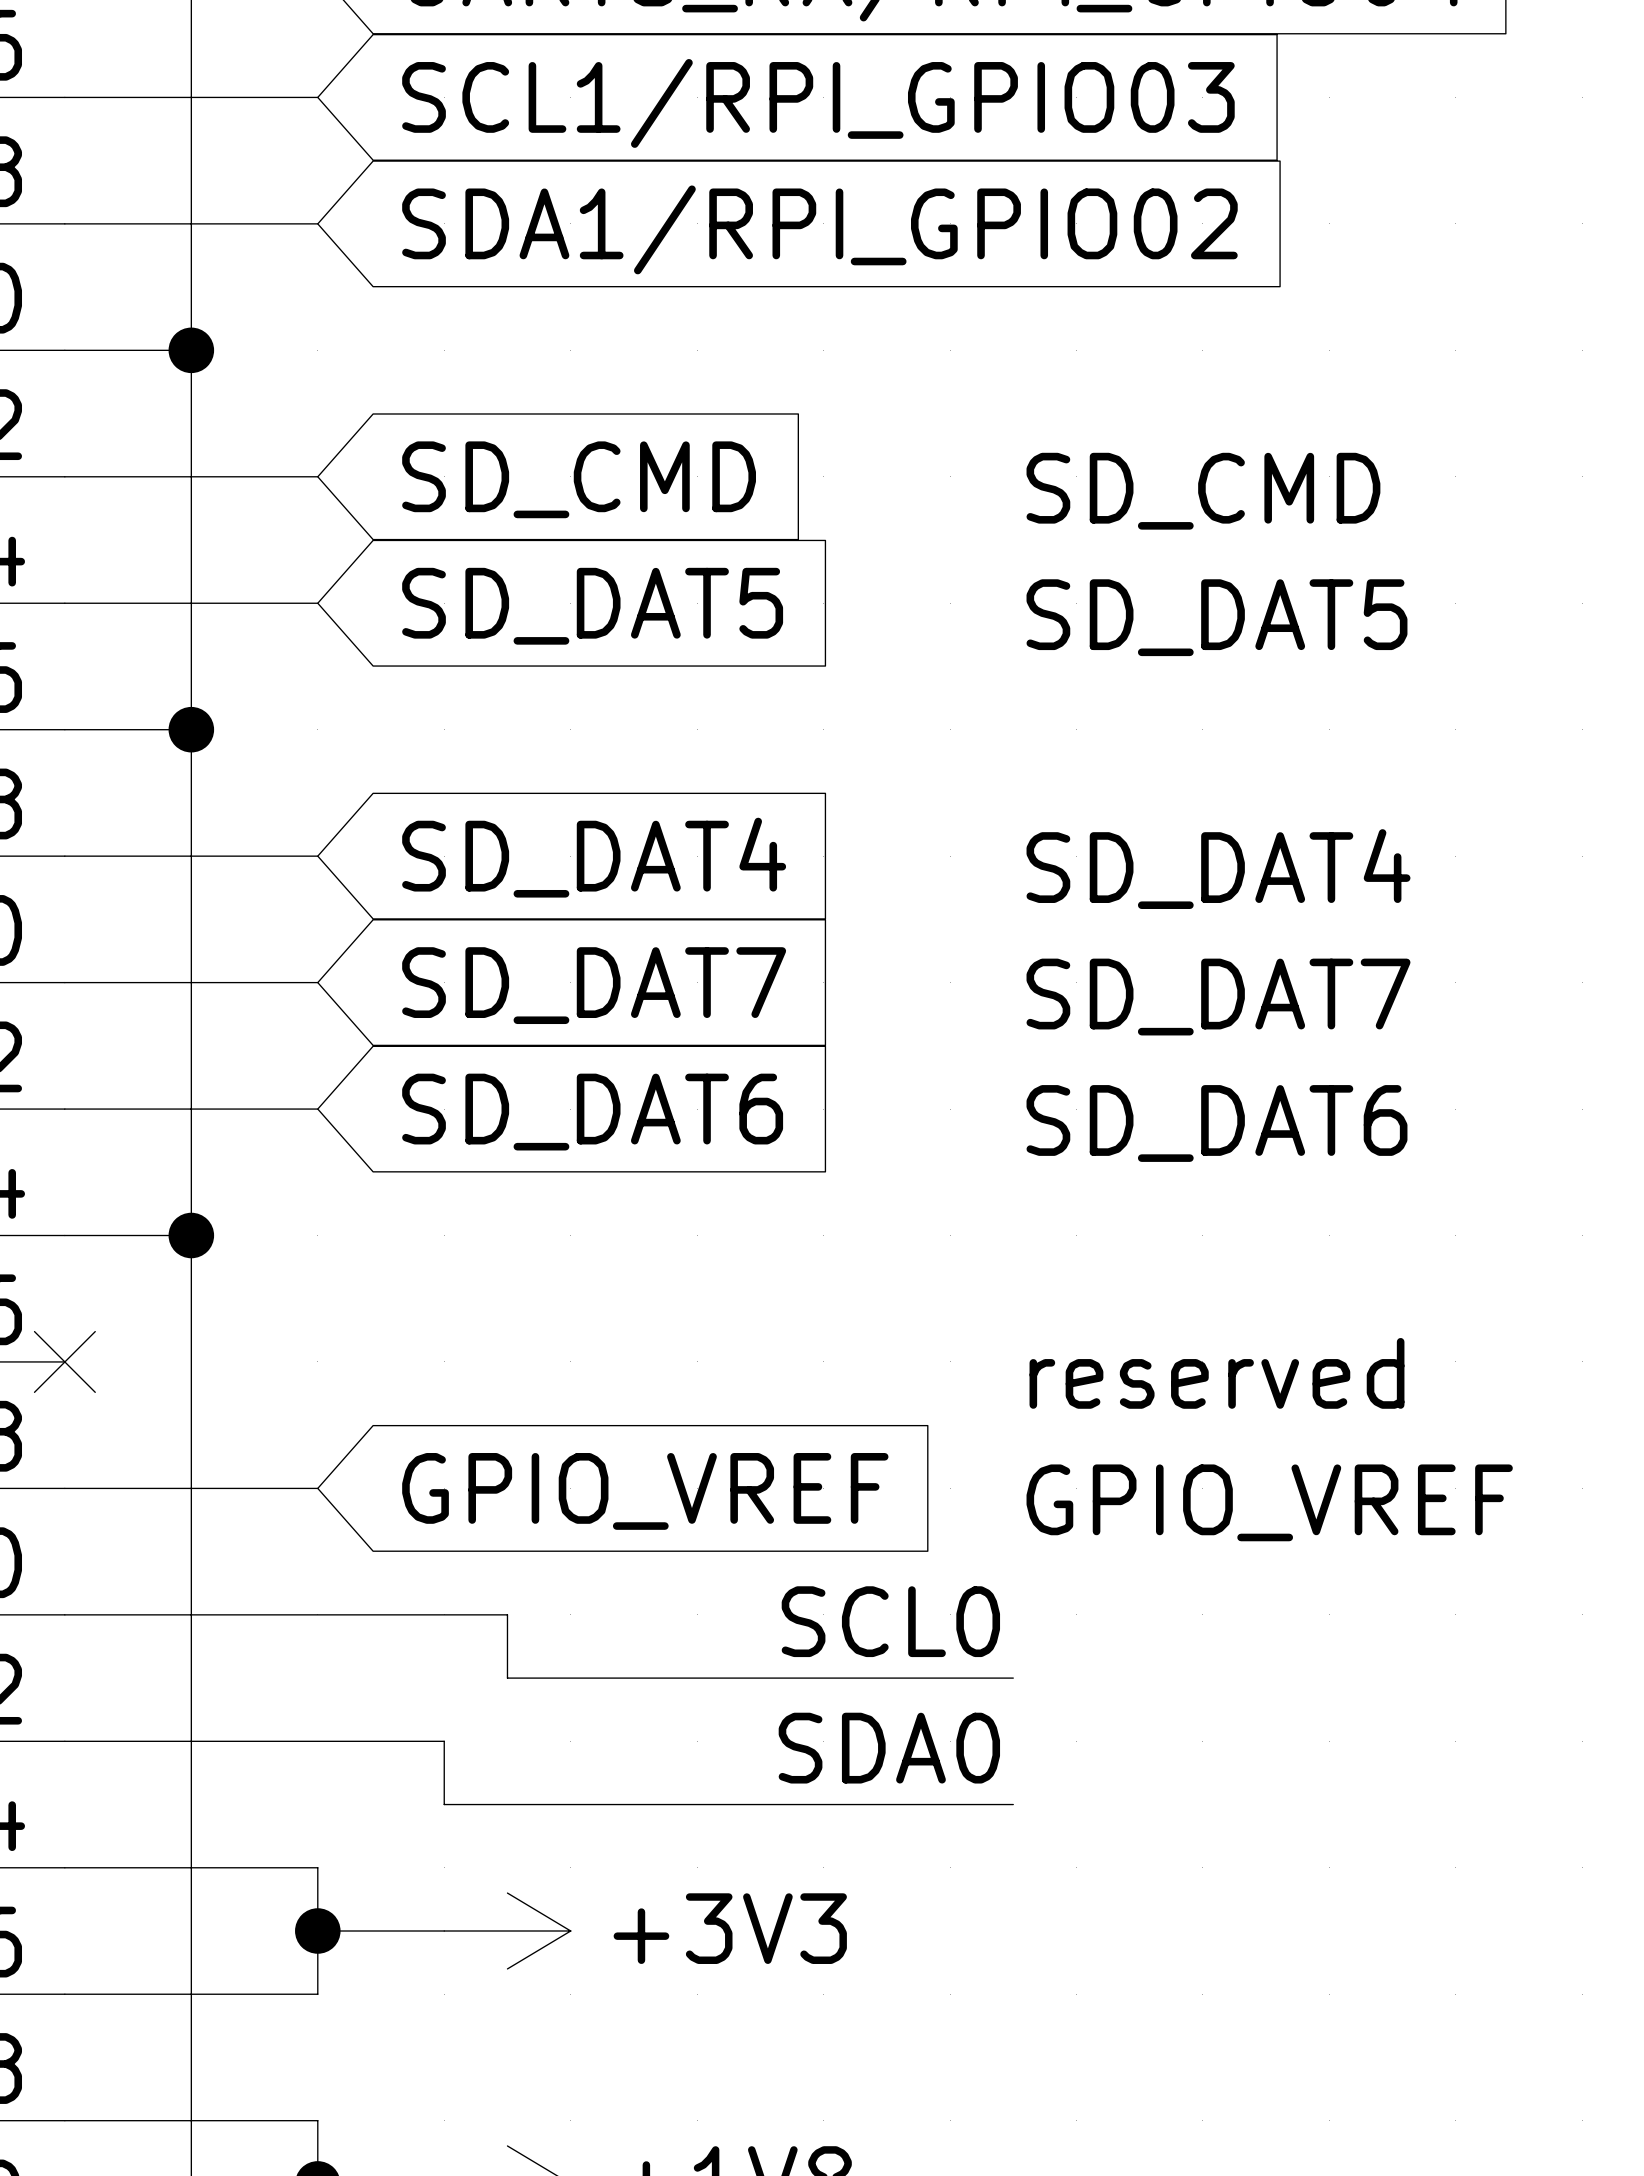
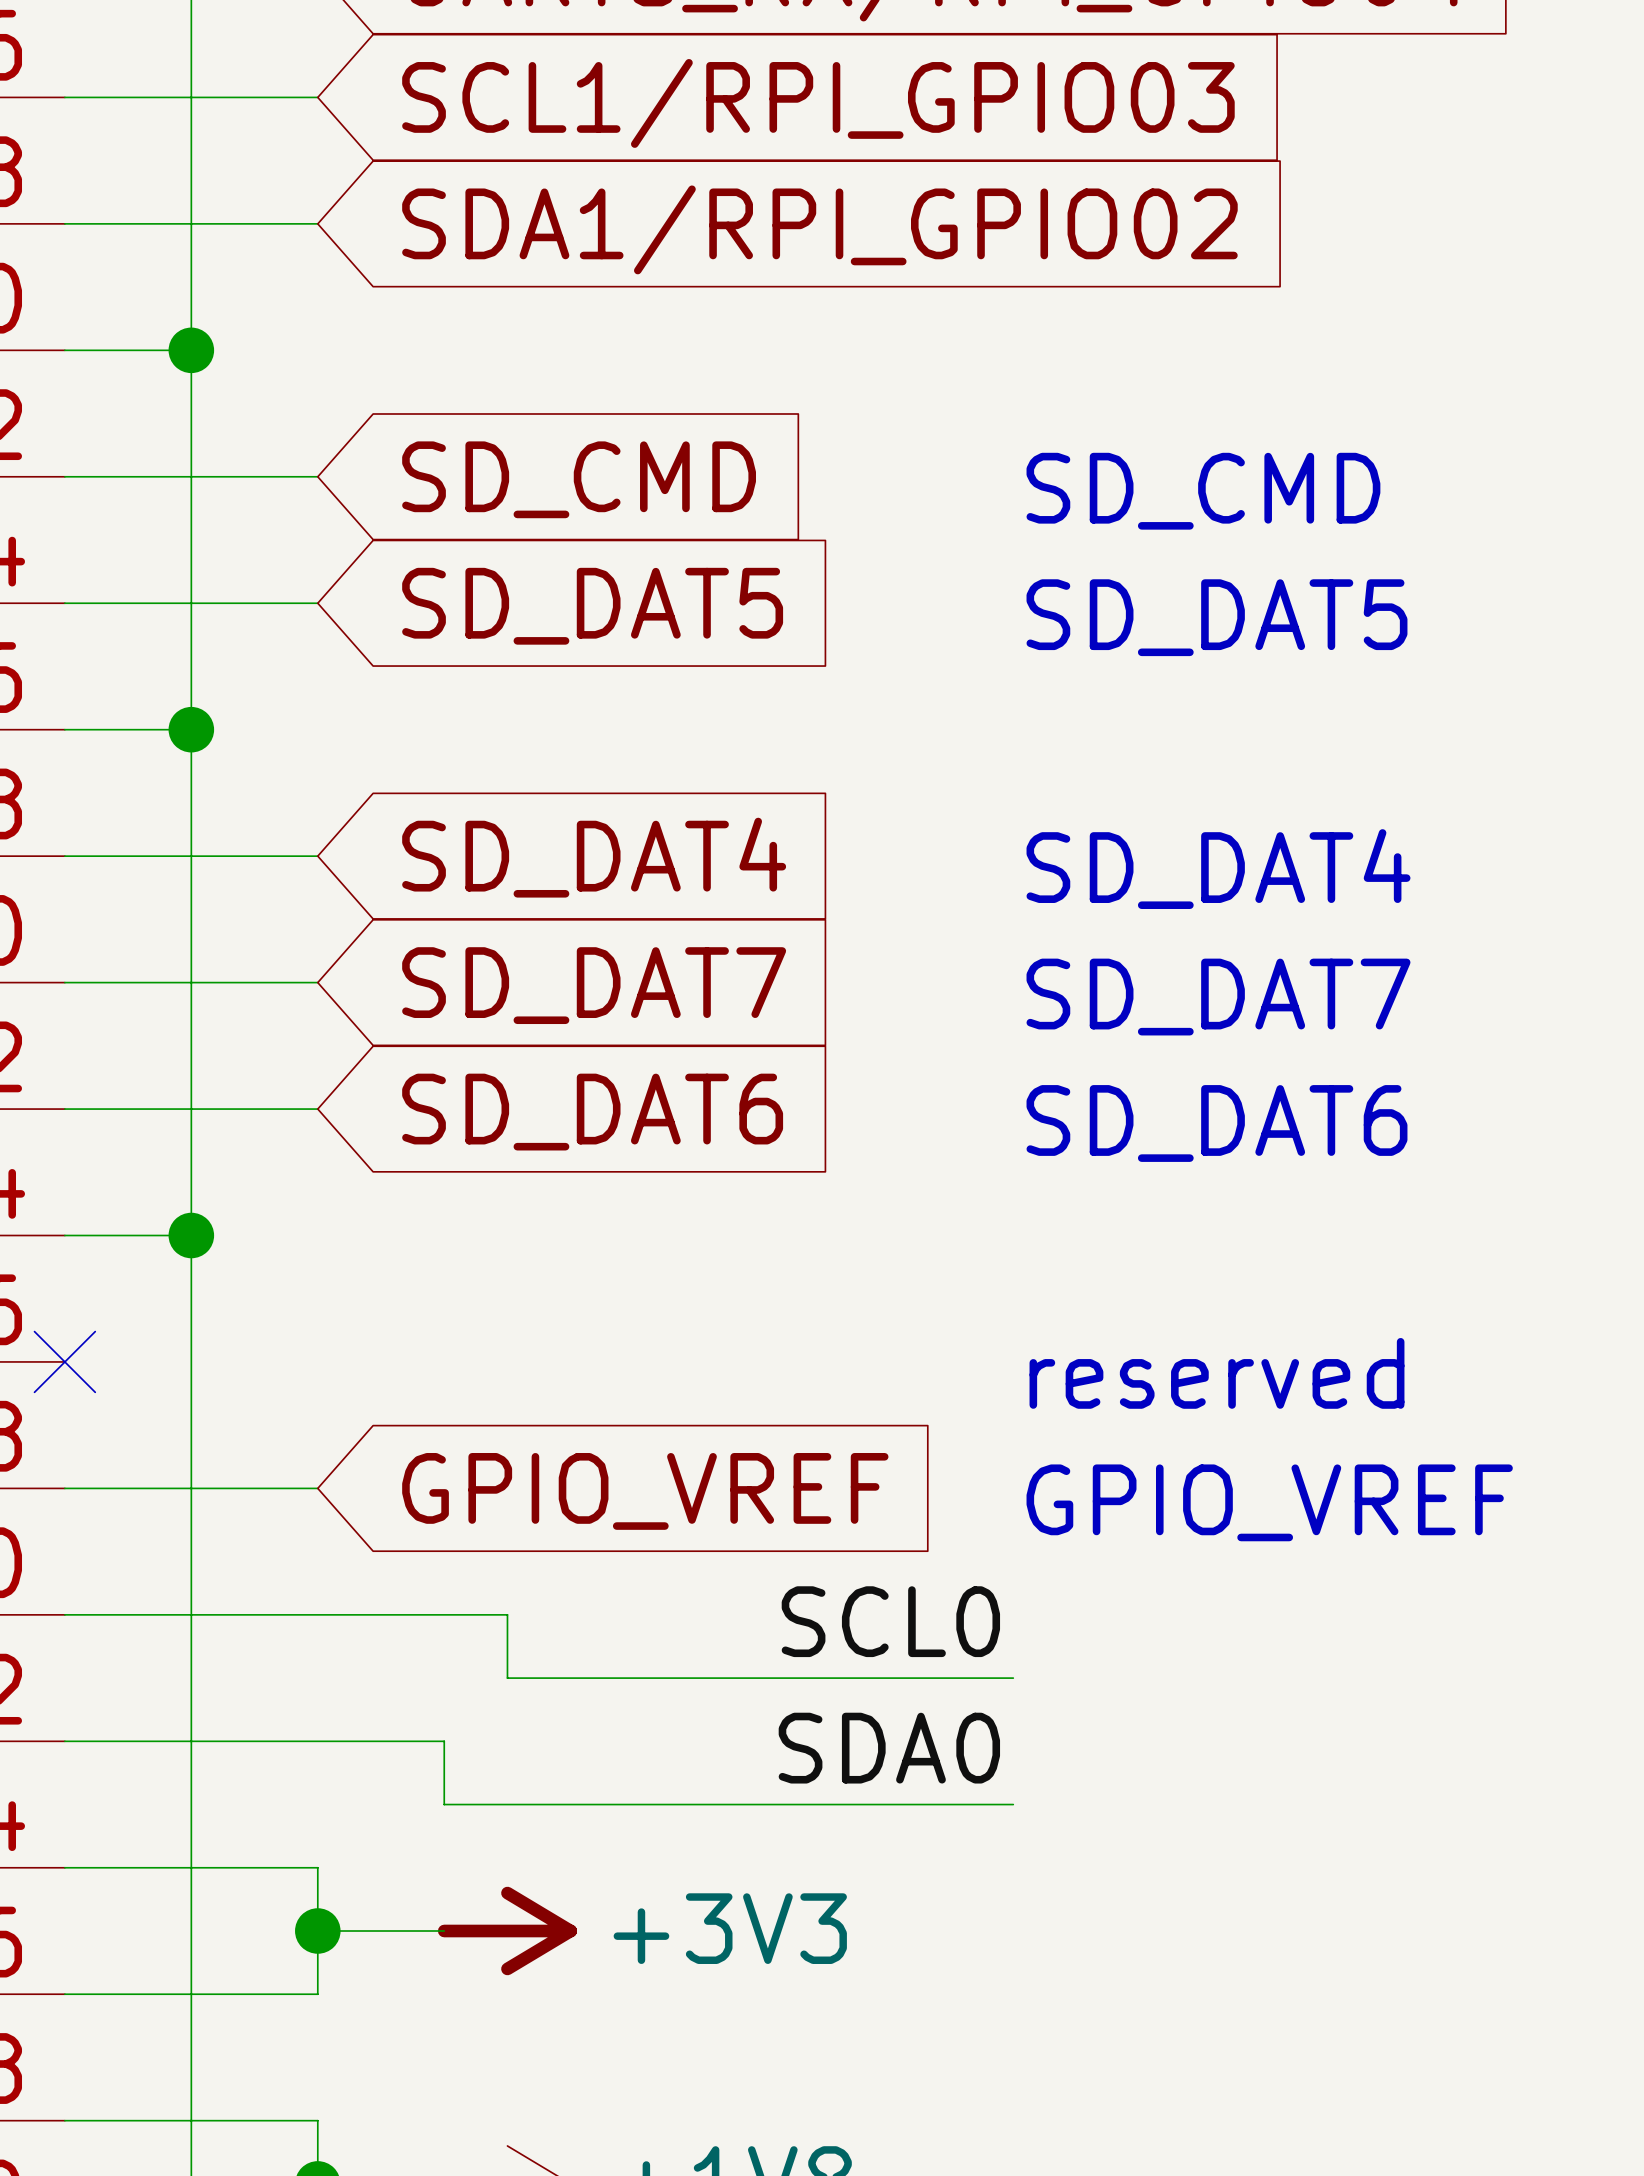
power symbol shape: [444, 1893, 571, 1969] -> [437, 1886, 578, 1976]

